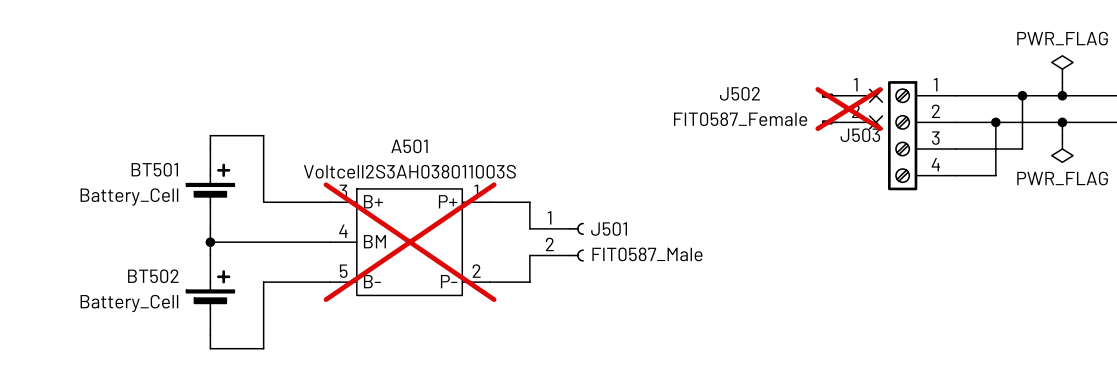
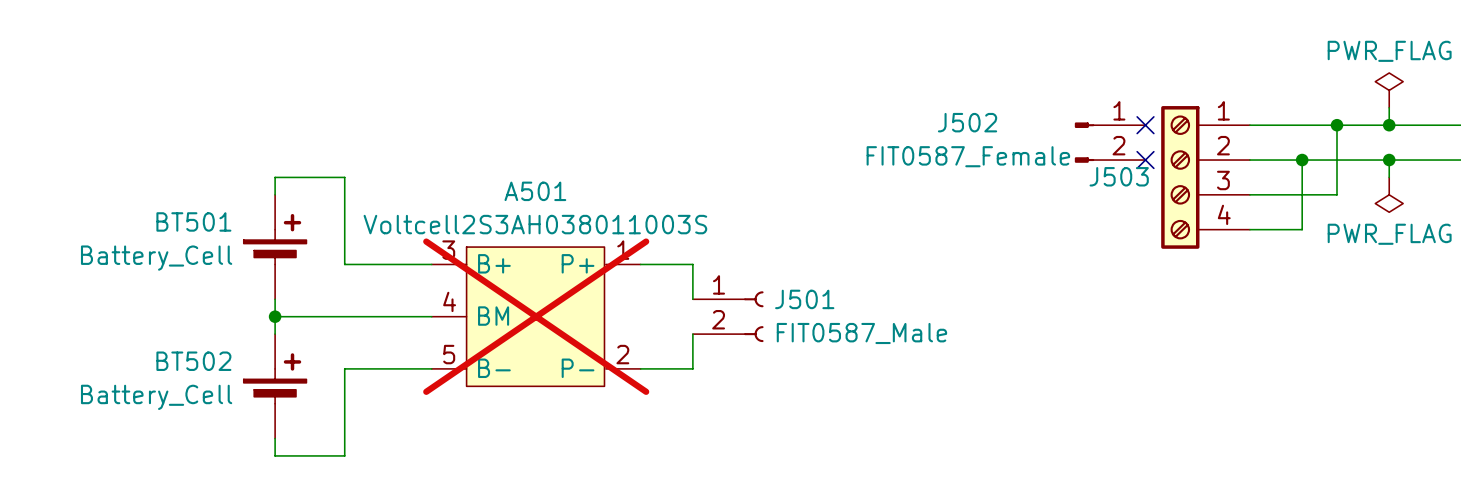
J502 do-not-place cross: (849, 109) -> none

